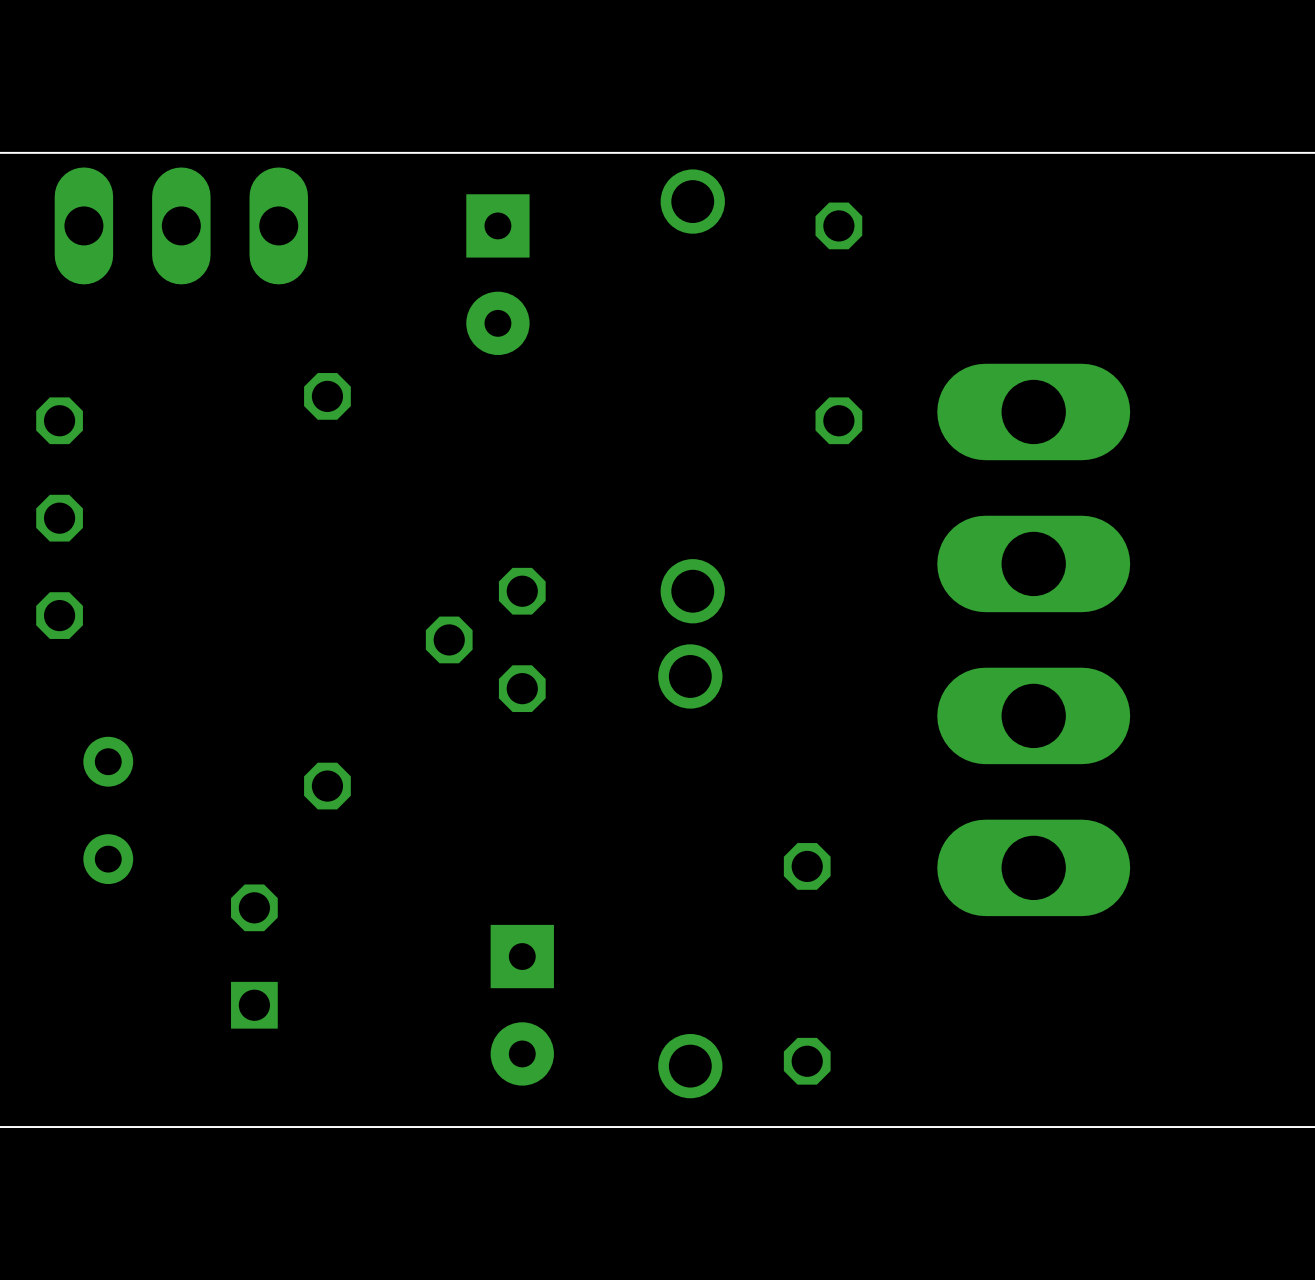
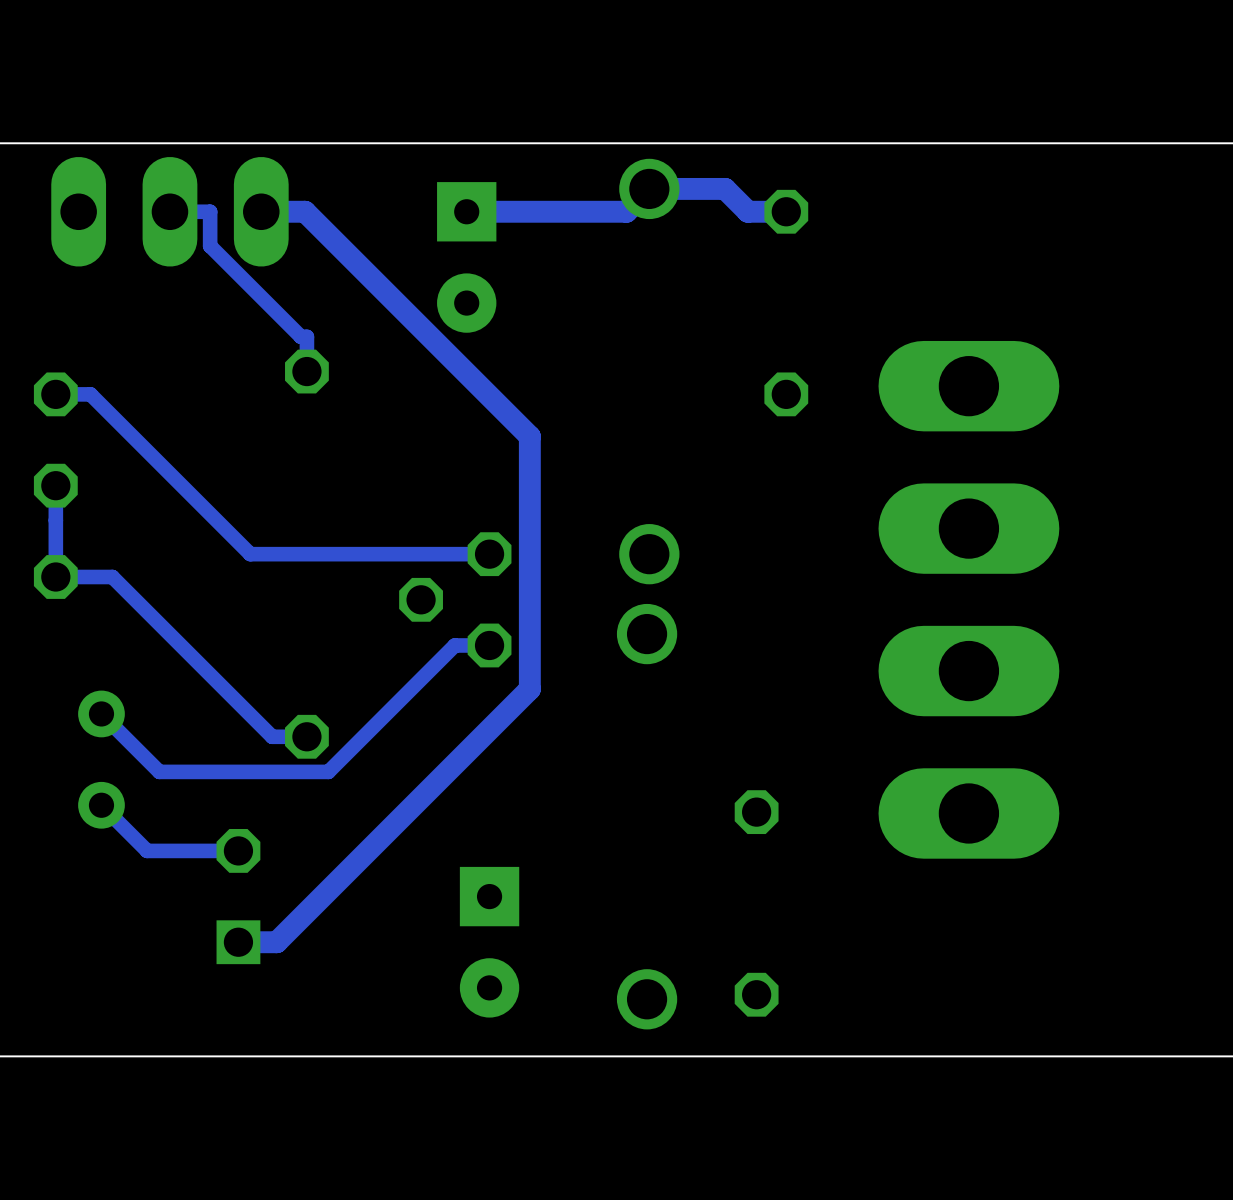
track: none -> (169, 211) (210, 211) (210, 246) (300, 336) (306, 336) (306, 371)
track: none -> (261, 211) (305, 211) (529, 436) (529, 689) (276, 942) (238, 942)
track: none -> (786, 211) (747, 211) (725, 188) (649, 188) (626, 211) (466, 211)
track: none -> (55, 394) (90, 394) (250, 554) (489, 554)
track: none -> (55, 485) (55, 576) (112, 576) (272, 736) (306, 736)
track: none -> (489, 645) (454, 645) (328, 771) (159, 771) (101, 713)
track: none -> (101, 805) (147, 850) (238, 850)

